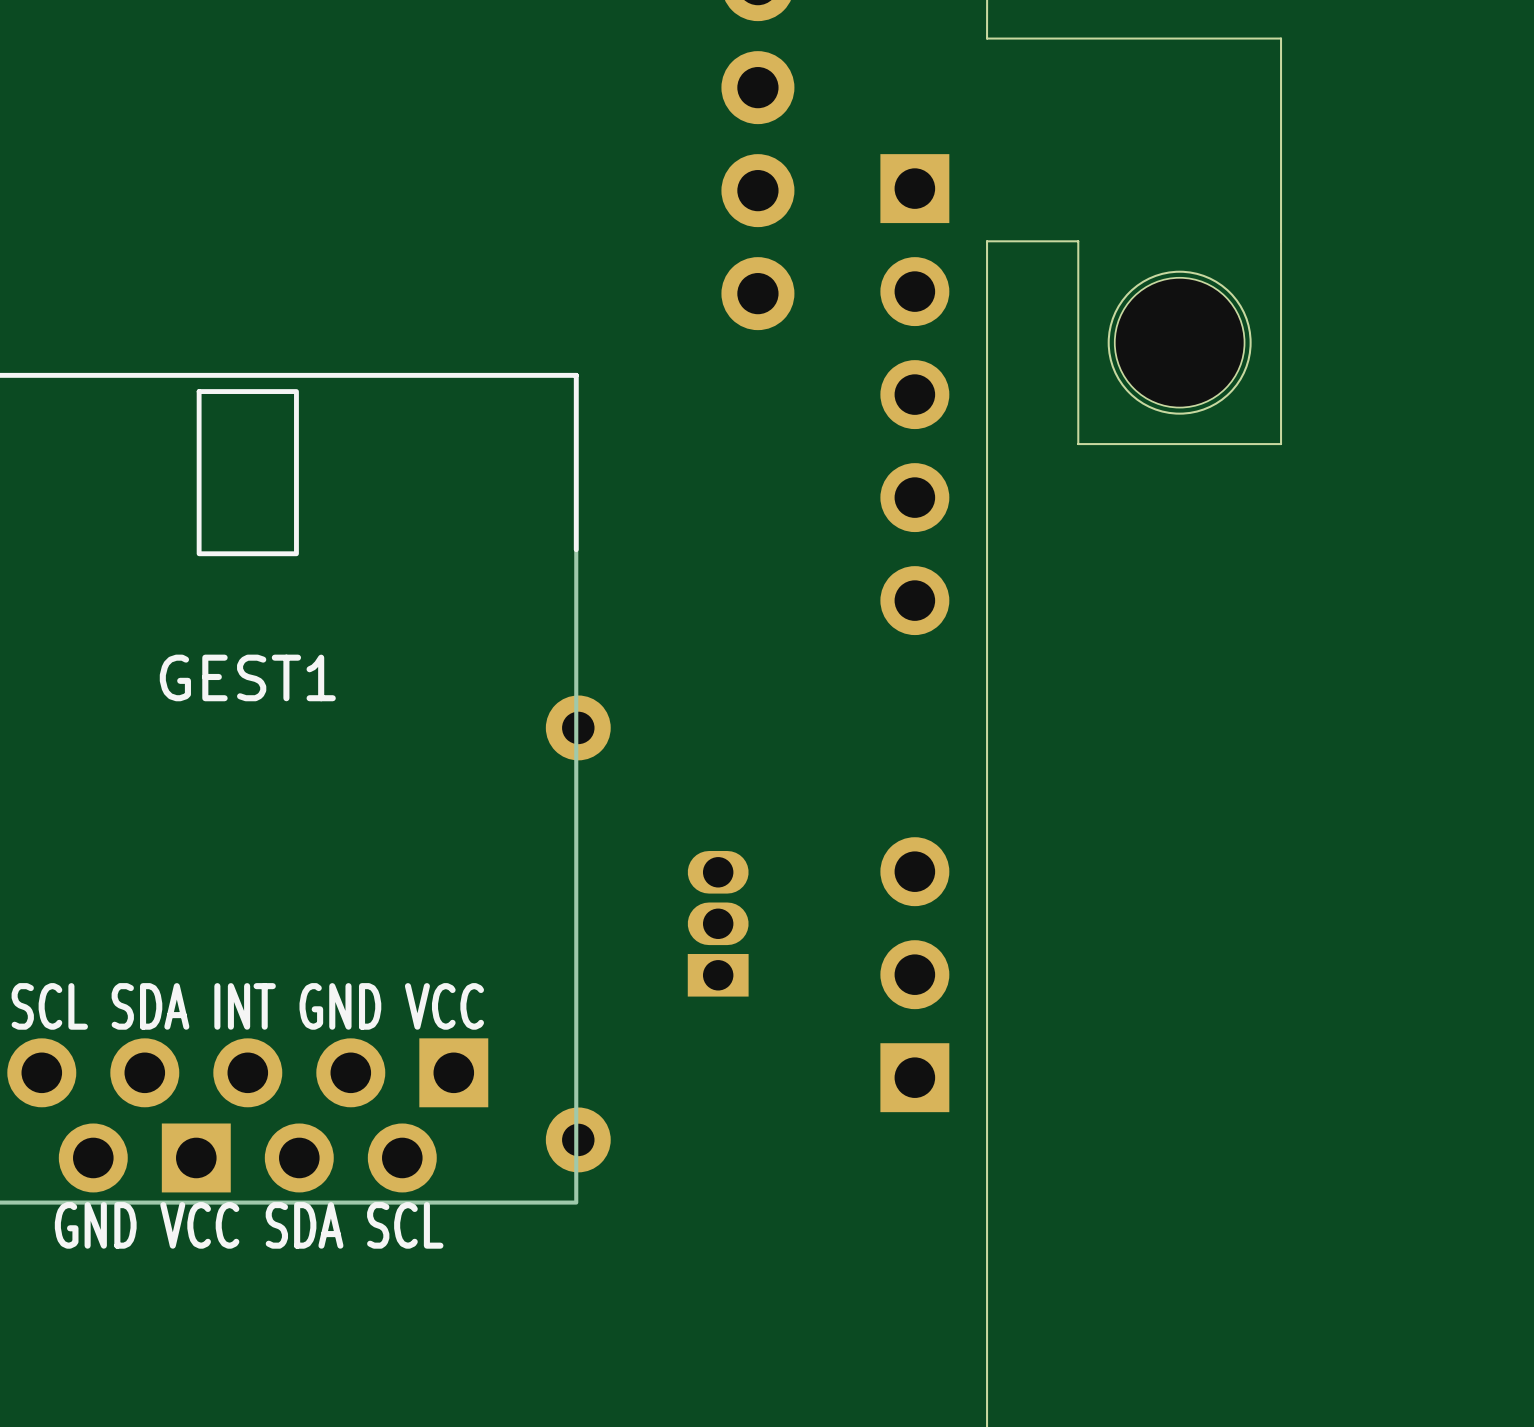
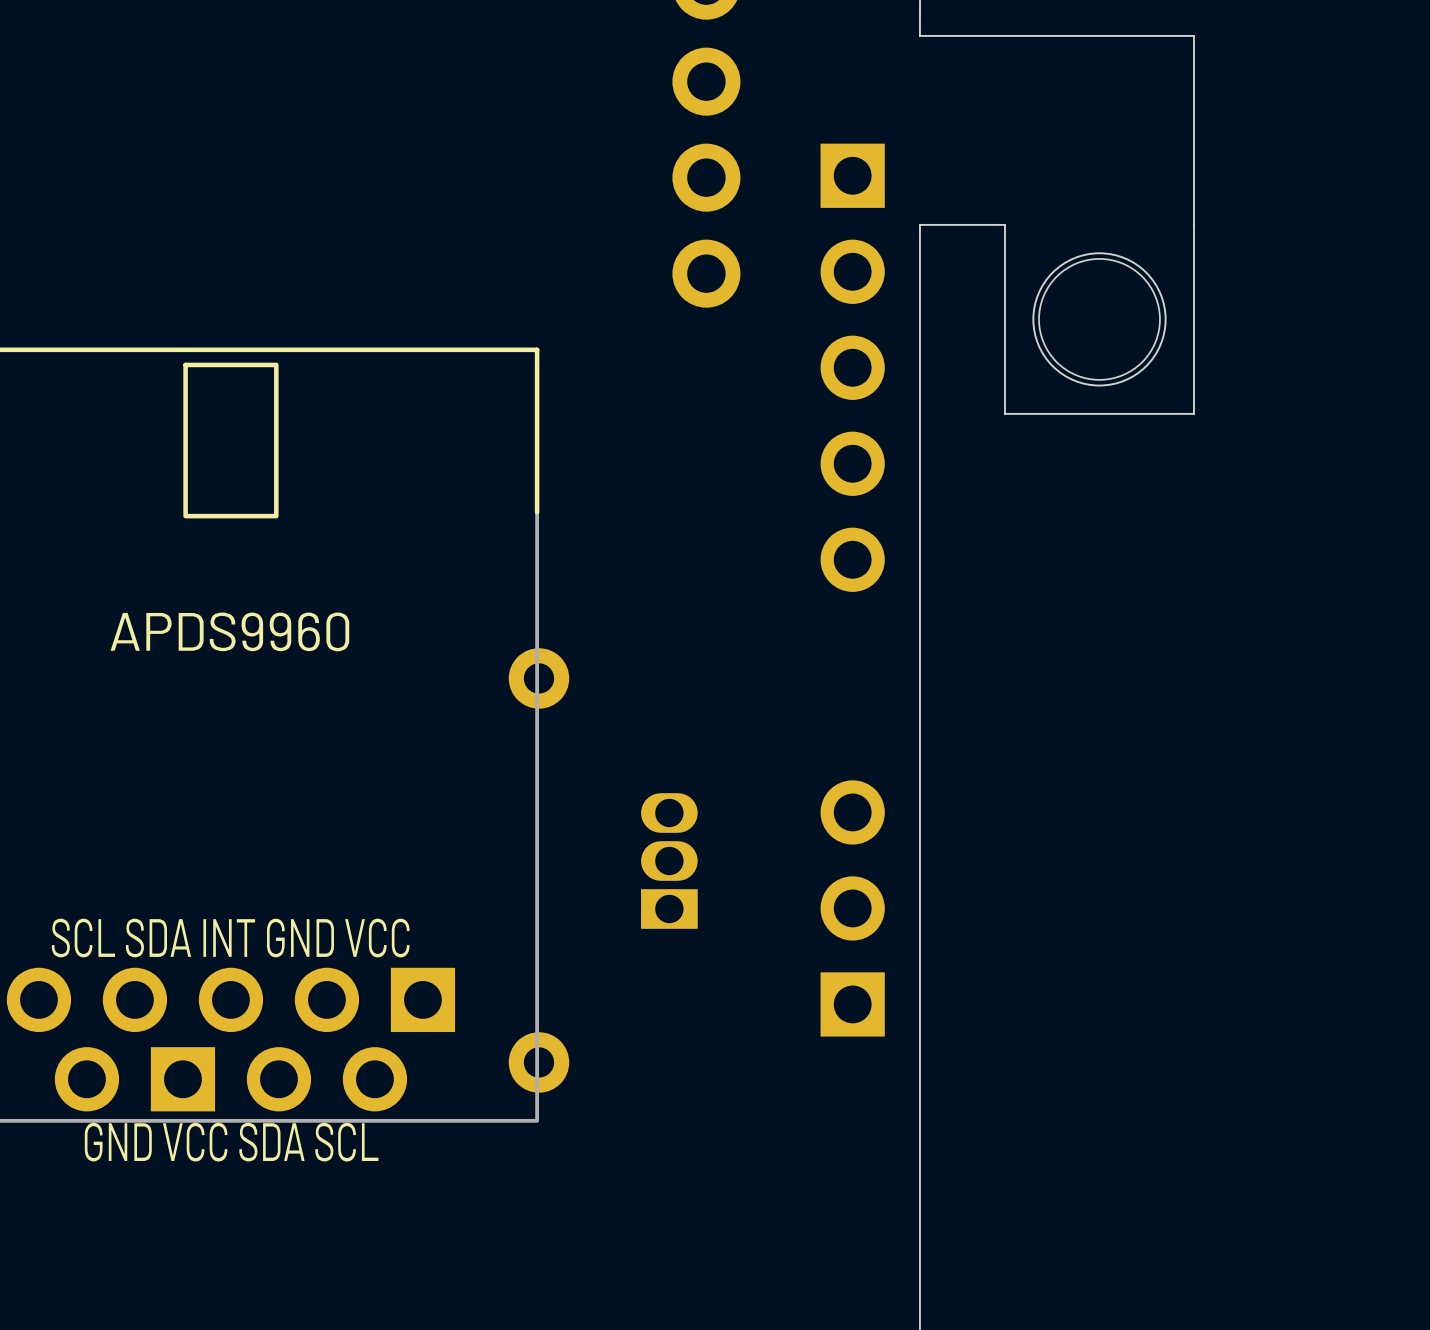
GEST1 name: GEST1 (247, 677) -> APDS9960 (229, 631)

